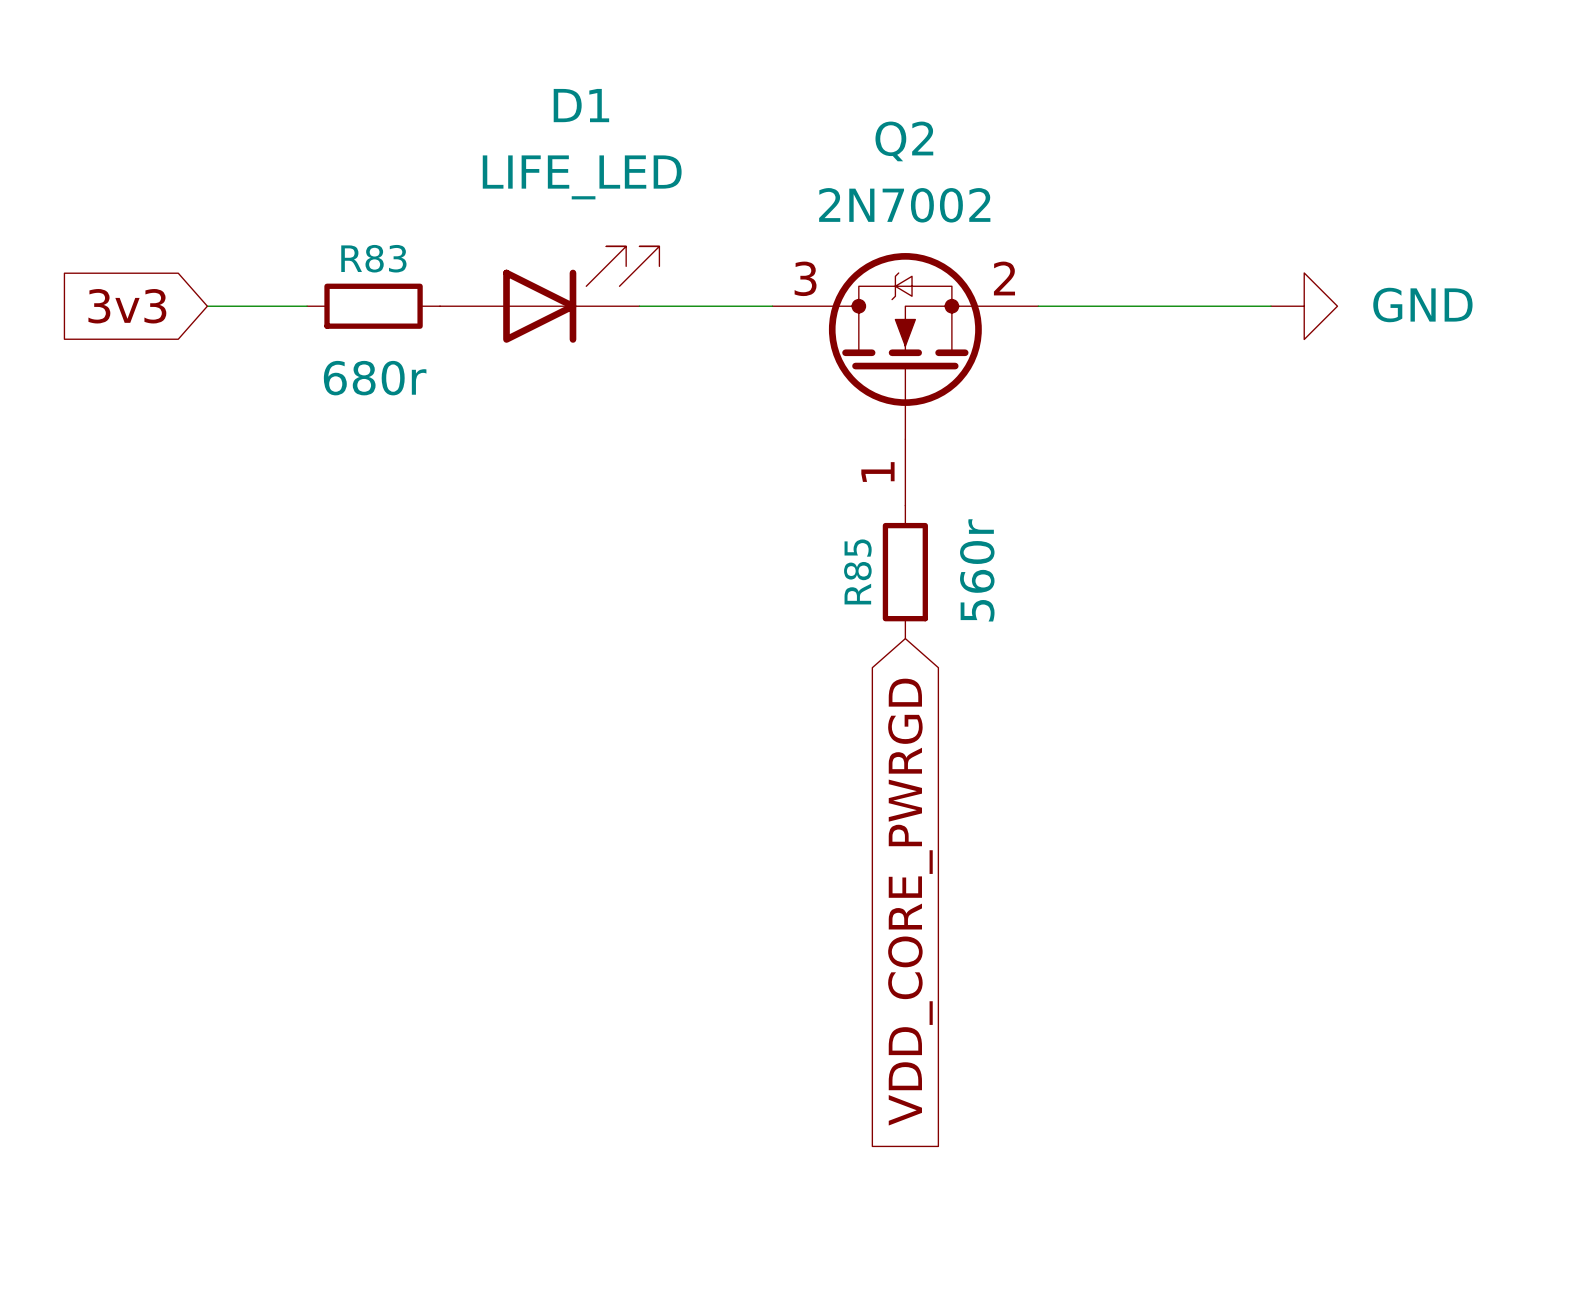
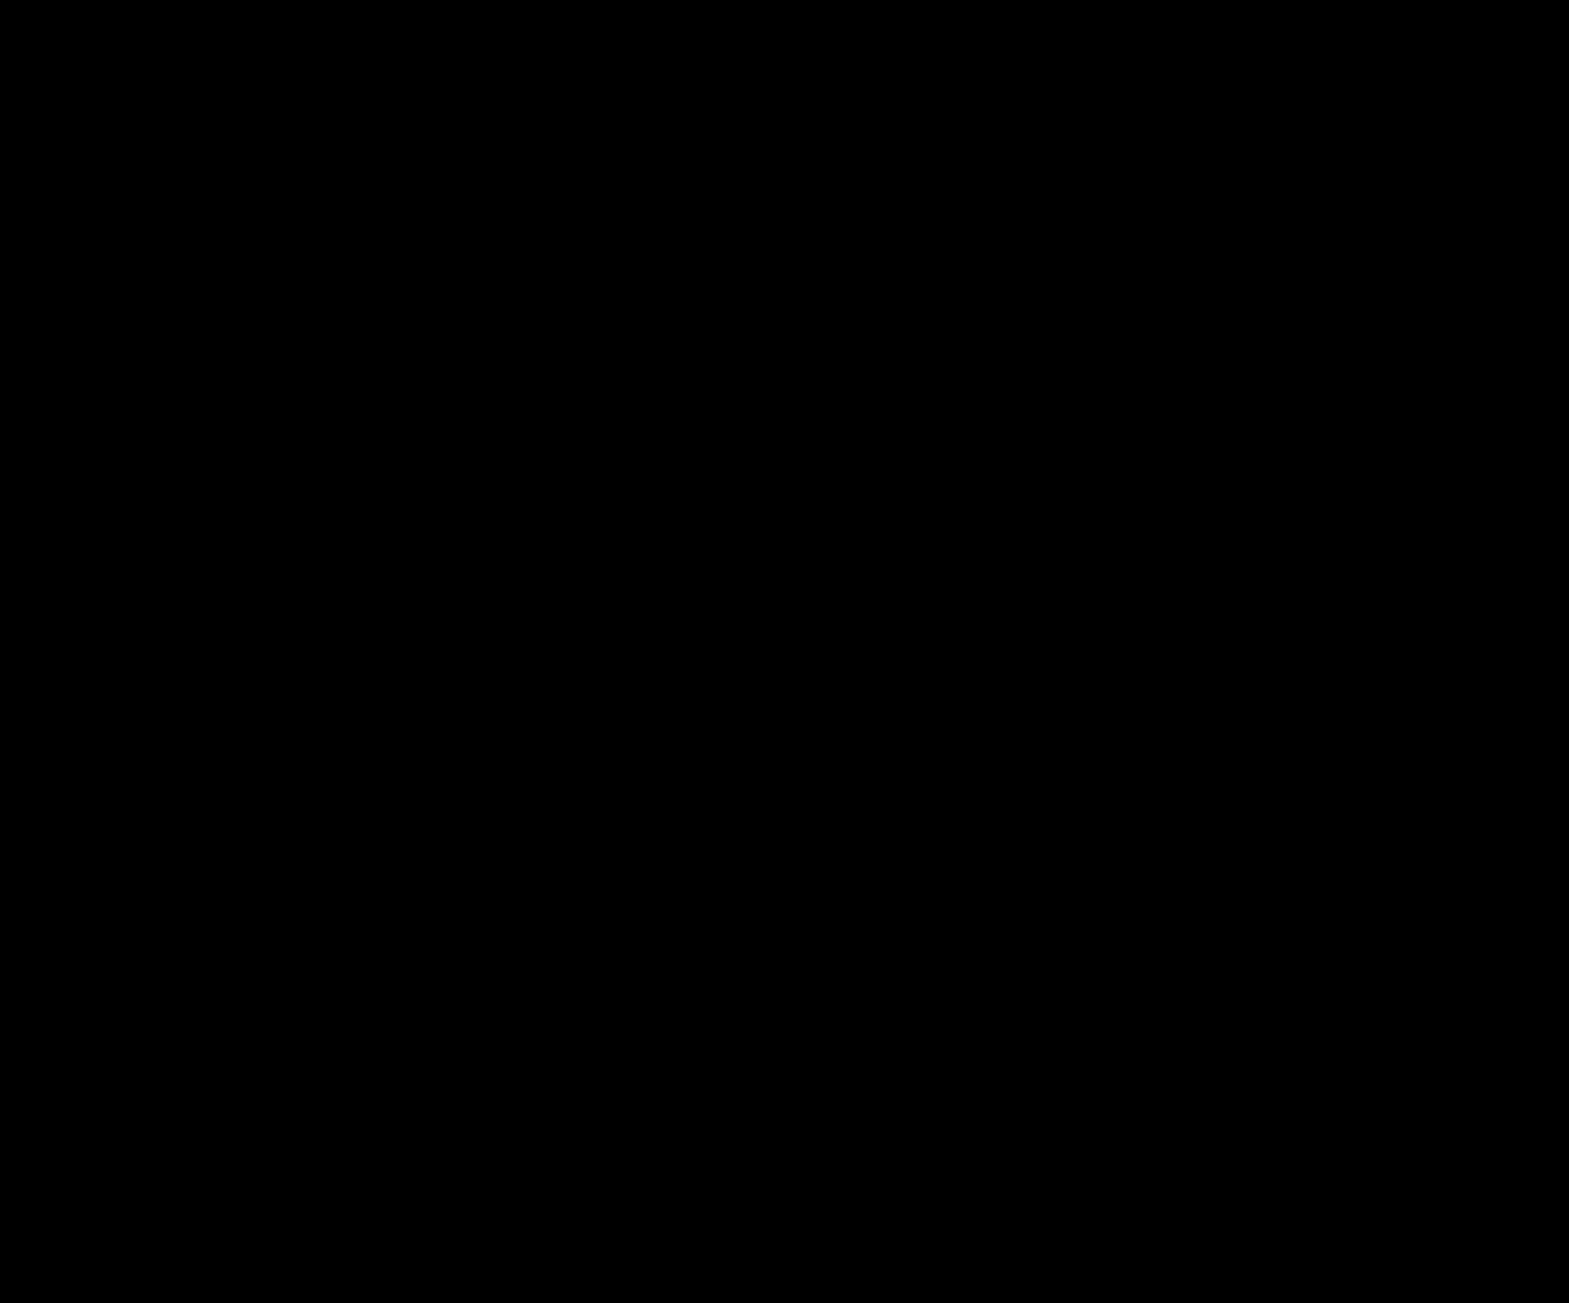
D1: LIFE_LED (549, 294) -> none
global label: 3v3 (127, 306) -> none
wire: (207, 306) (307, 306) -> none
R83: 680r (373, 306) -> none
wire: (639, 306) (772, 306) -> none
wire: (1038, 306) (1270, 306) -> none
power symbol: GND (1304, 306) -> none
Q2: 2N7002 (905, 379) -> none
R85: 560r (905, 572) -> none
global label: VDD_CORE_PWRGD (910, 902) -> none

